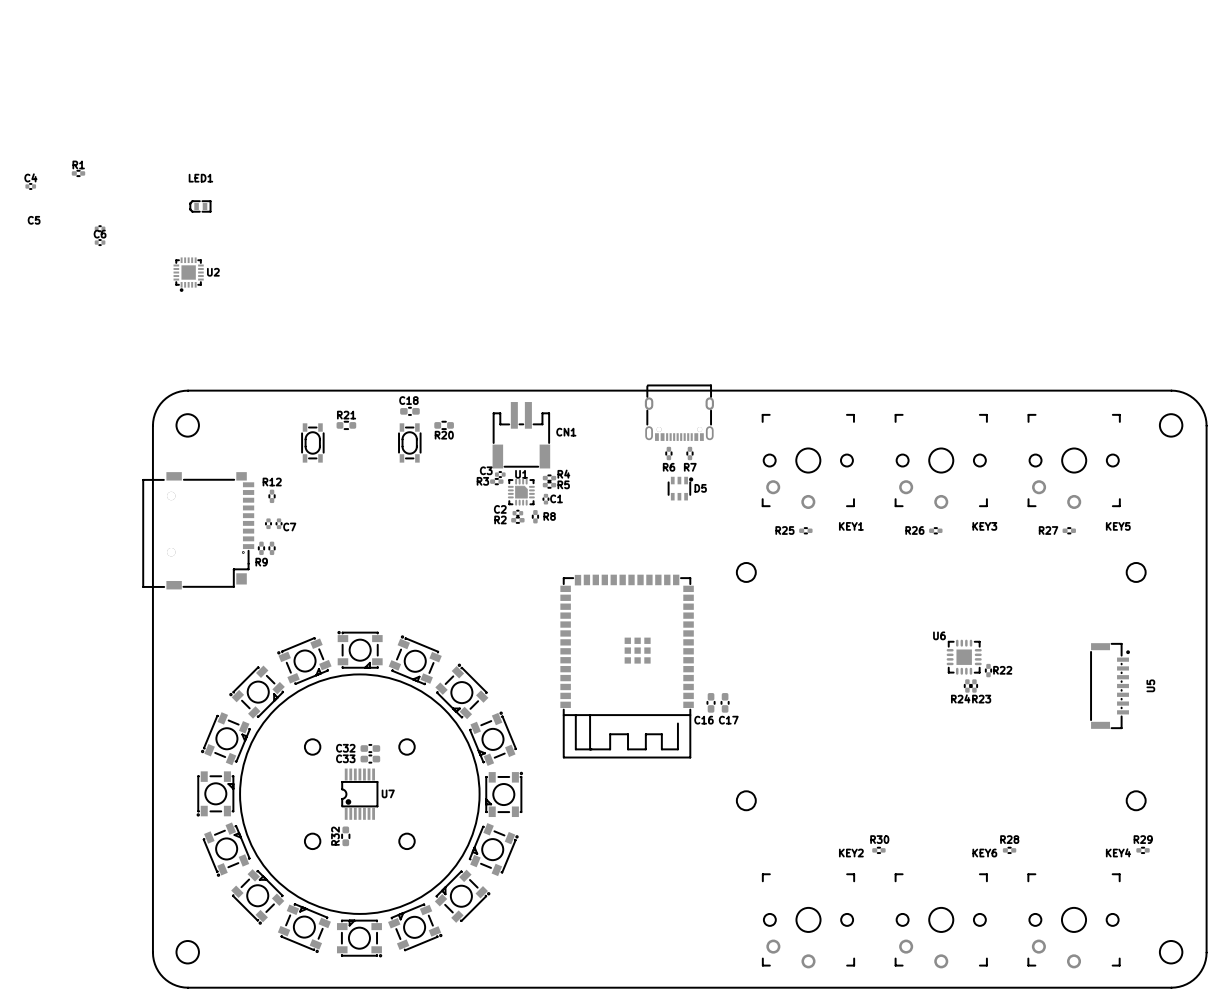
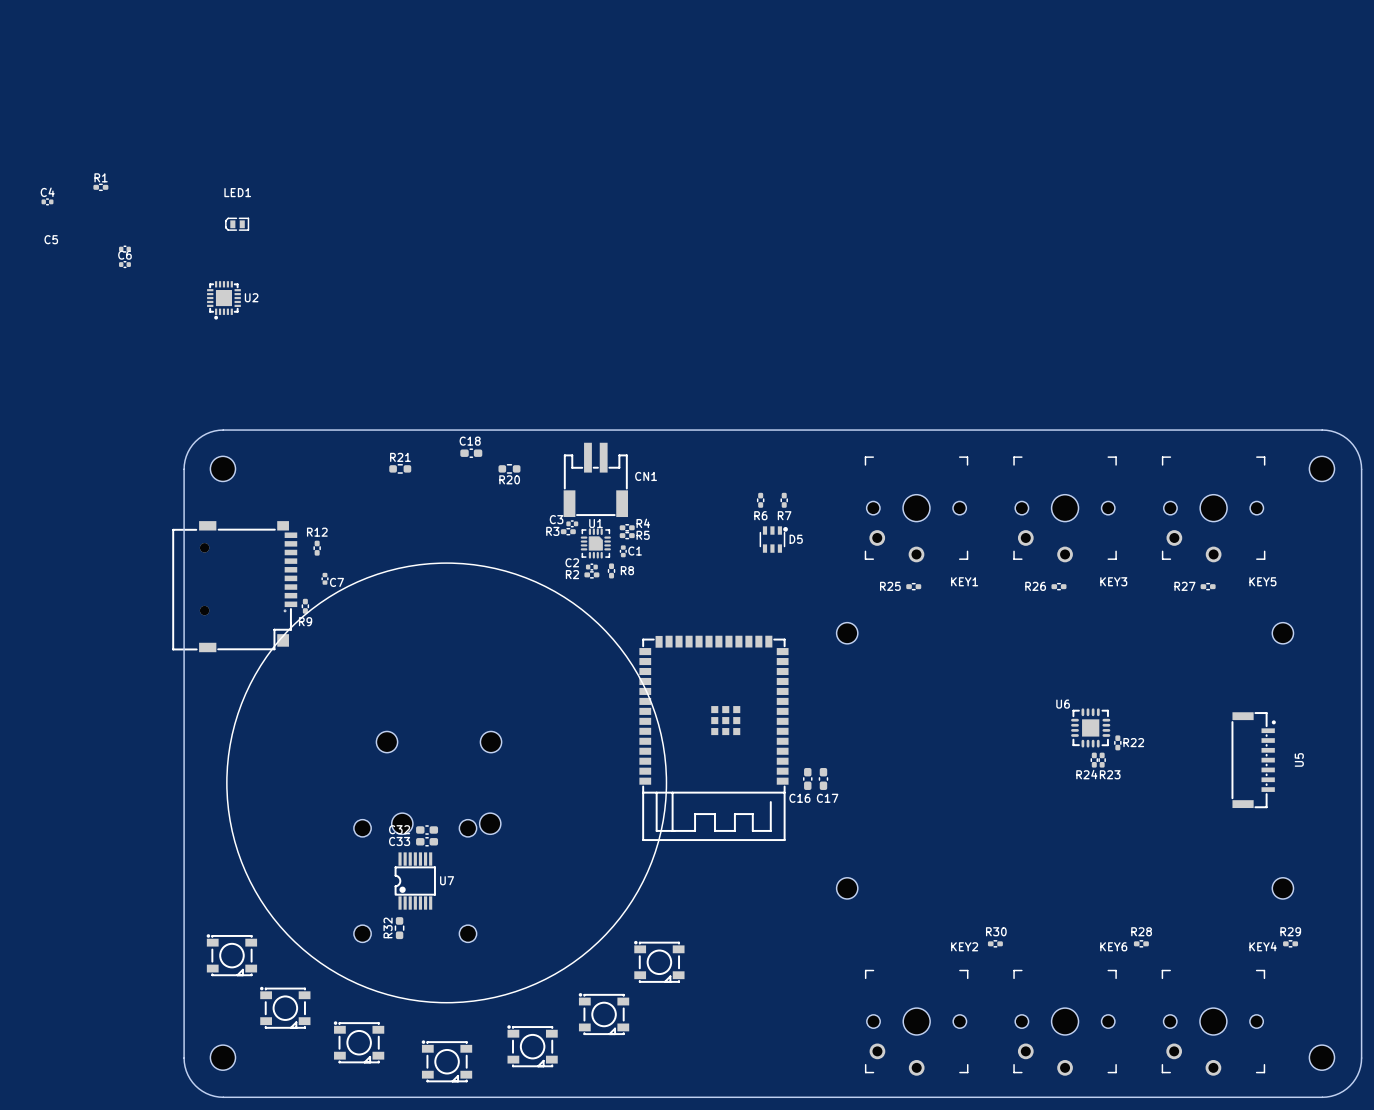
part: (679, 412) -> none
part: (312, 442) -> none
part: (409, 442) -> none
drawing: none -> [226, 562, 667, 1004]
part: (268, 523) -> none
part: (272, 548) -> none
part: (360, 649) -> none
part: (415, 660) -> none
part: (304, 661) -> none
part: none -> (387, 742)
part: none -> (491, 742)
drawing: [239, 674, 480, 915] -> none
part: (461, 691) -> none
part: (257, 692) -> none
part: (225, 738) -> none
part: (492, 738) -> none
part: none -> (402, 823)
part: none -> (490, 823)
part: (215, 793) -> none
part: (504, 794) -> none
part: (226, 849) -> none
part: (493, 849) -> none
part: none -> (231, 955)
part: none -> (659, 961)
part: (257, 896) -> none
part: (462, 896) -> none
part: none -> (285, 1007)
part: none -> (603, 1014)
part: (415, 927) -> none
part: (304, 928) -> none
part: none -> (359, 1042)
part: (359, 938) -> none
part: none -> (532, 1046)
part: none -> (446, 1061)

